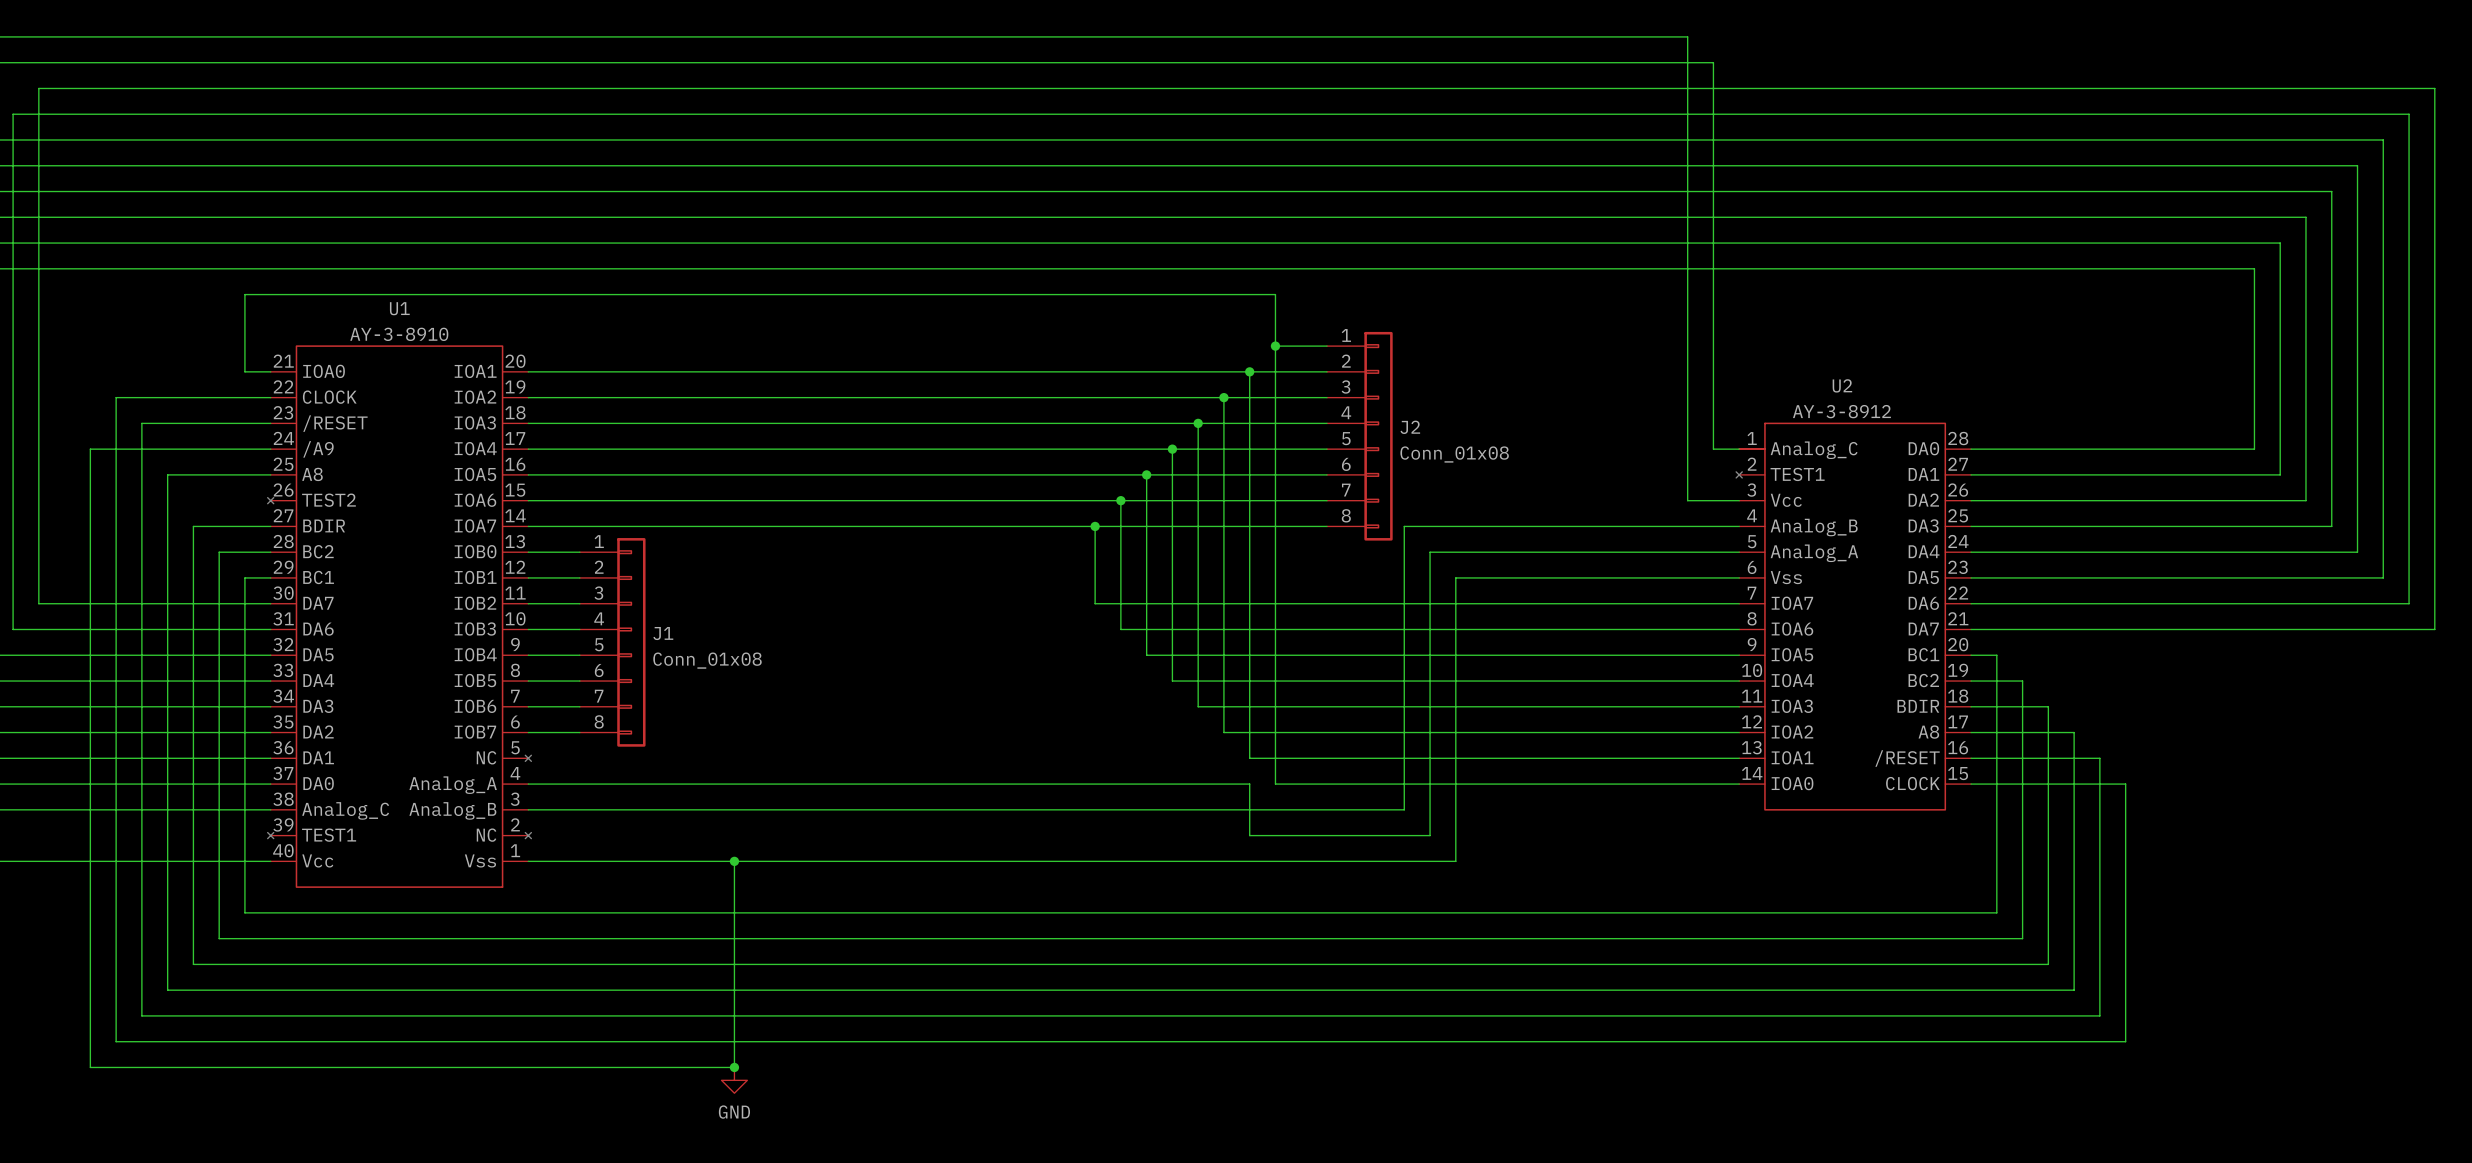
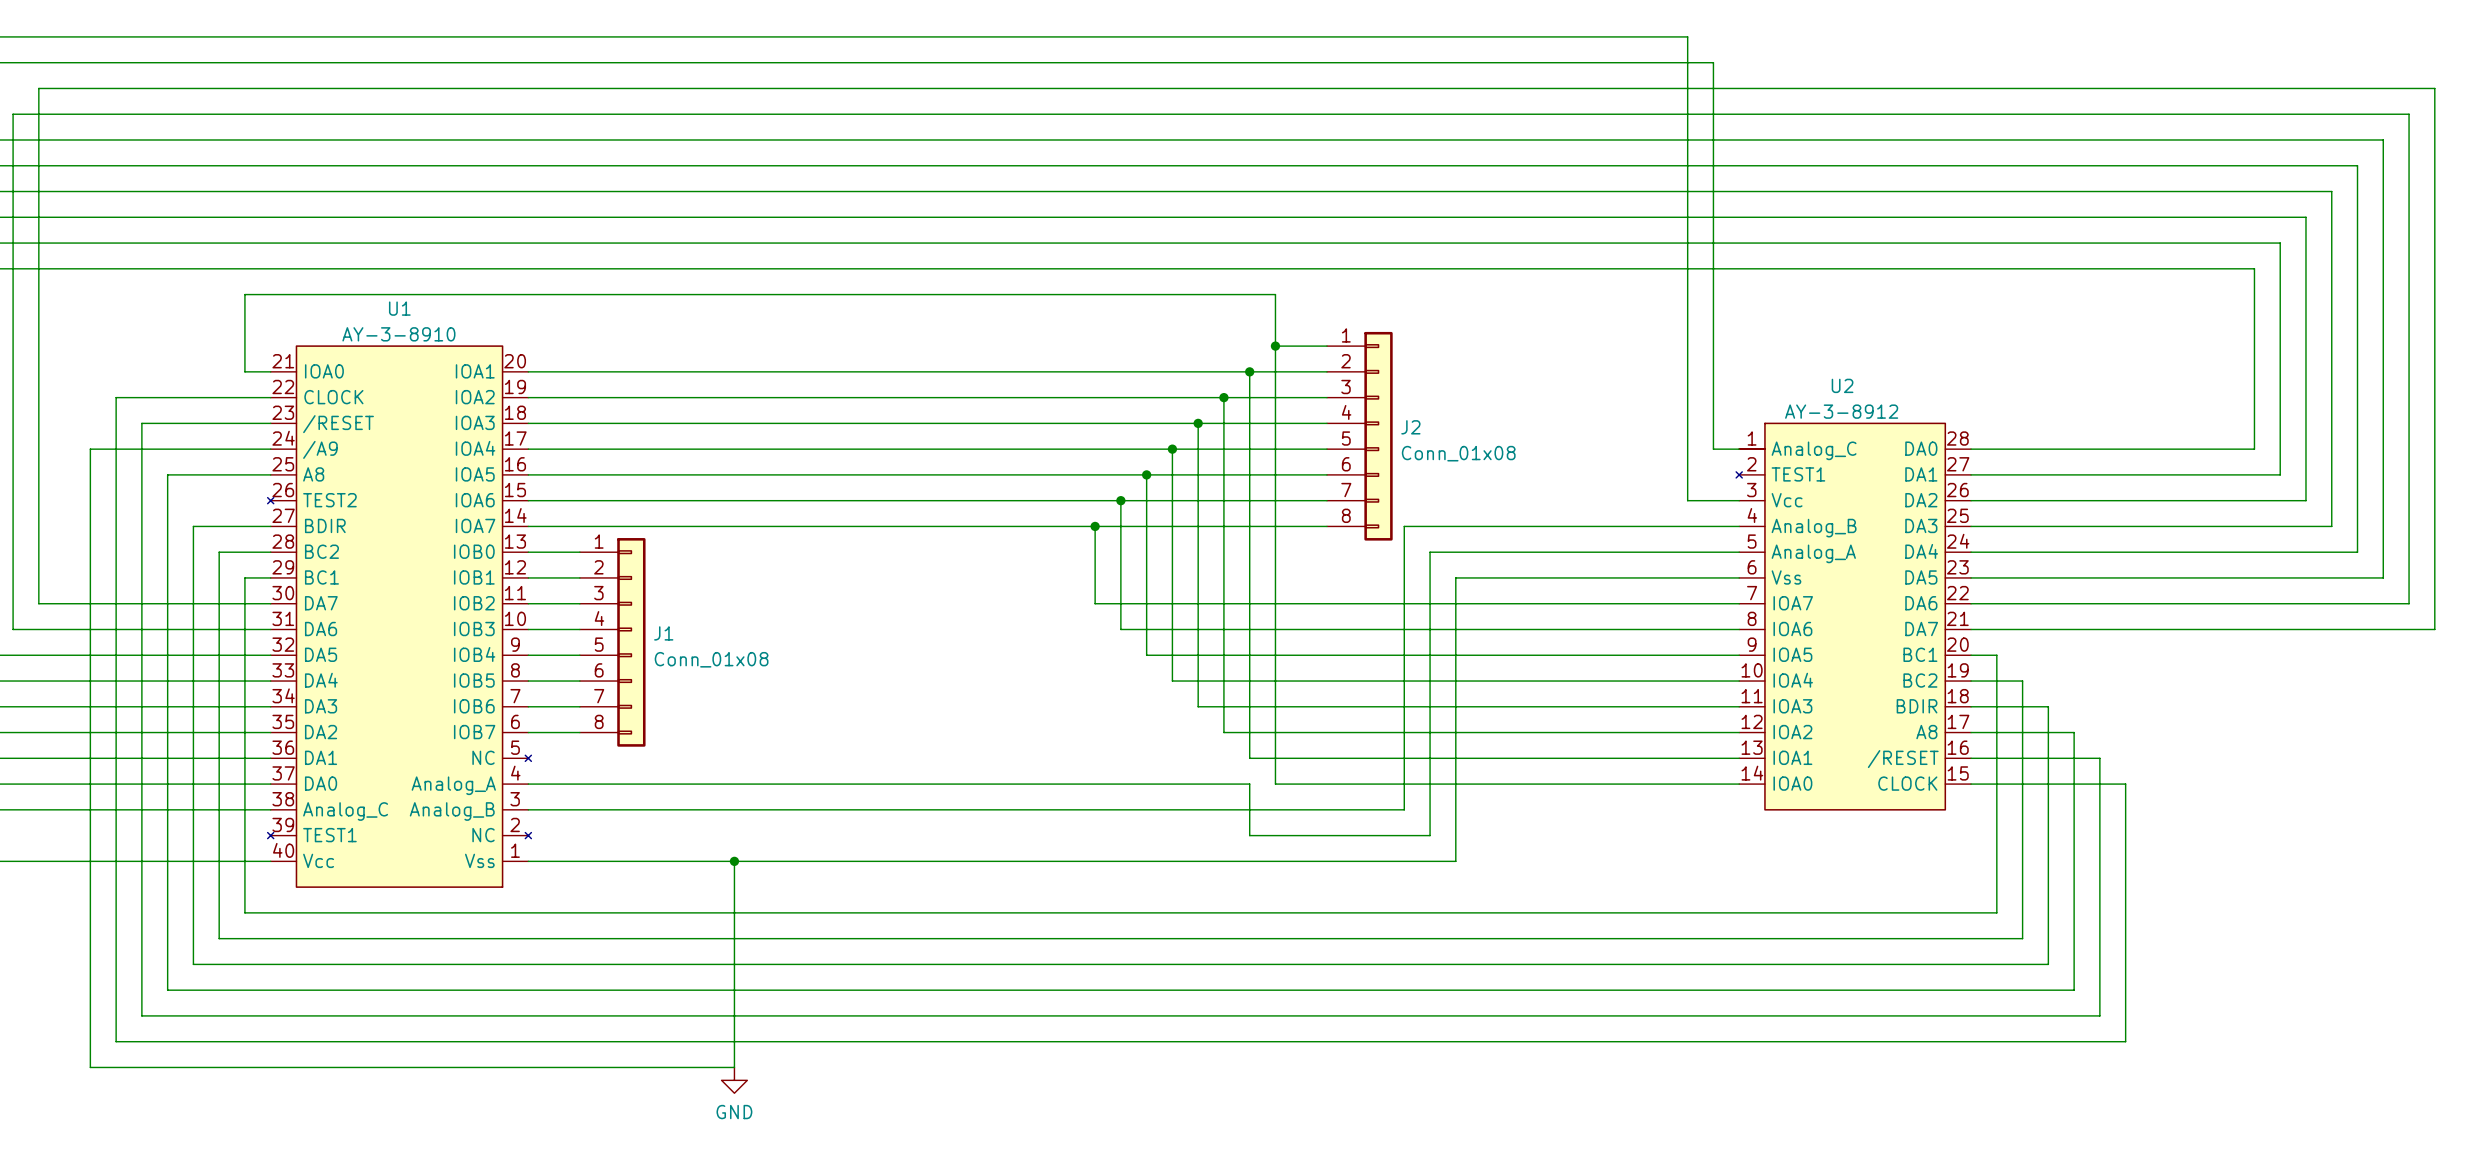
junction: (734, 1067) -> none

